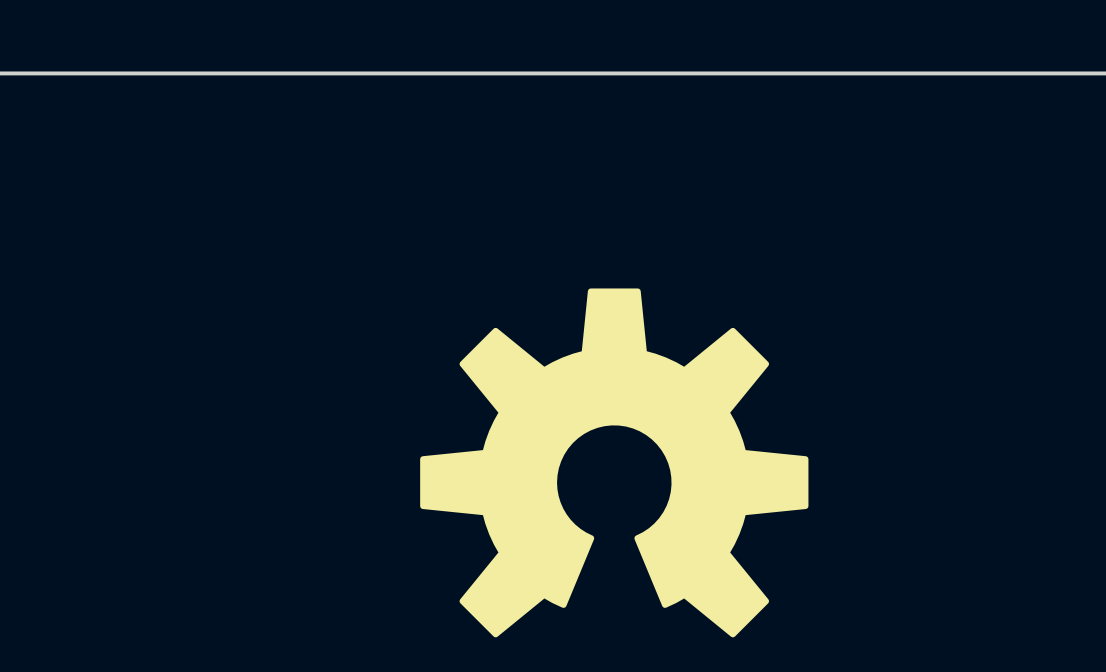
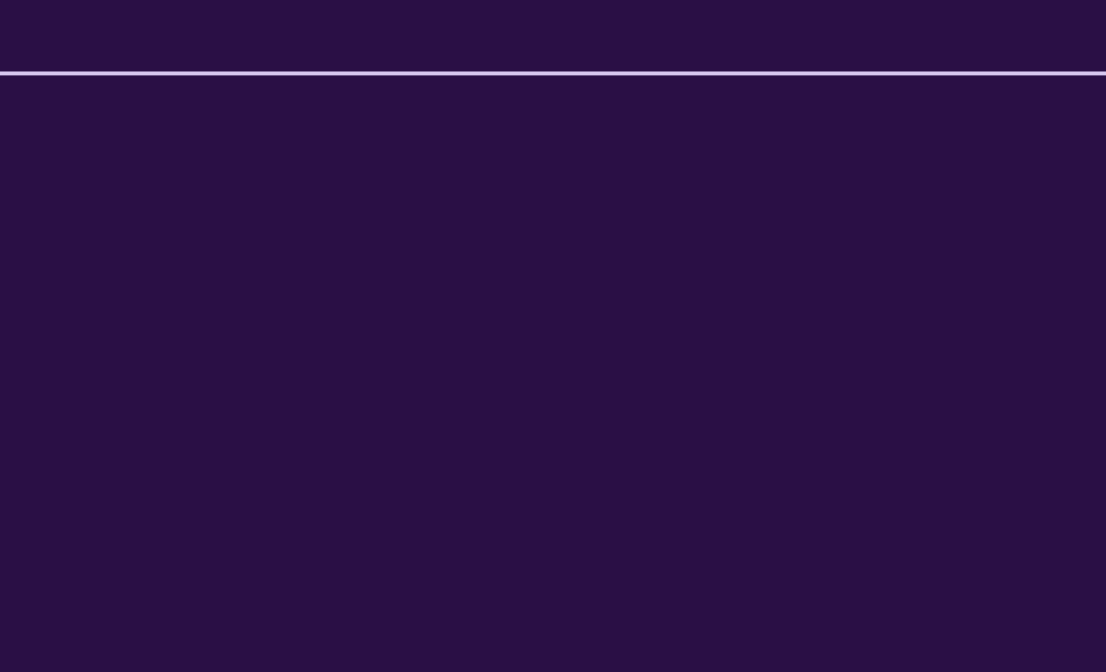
drawing: [420, 288, 809, 638] -> none

